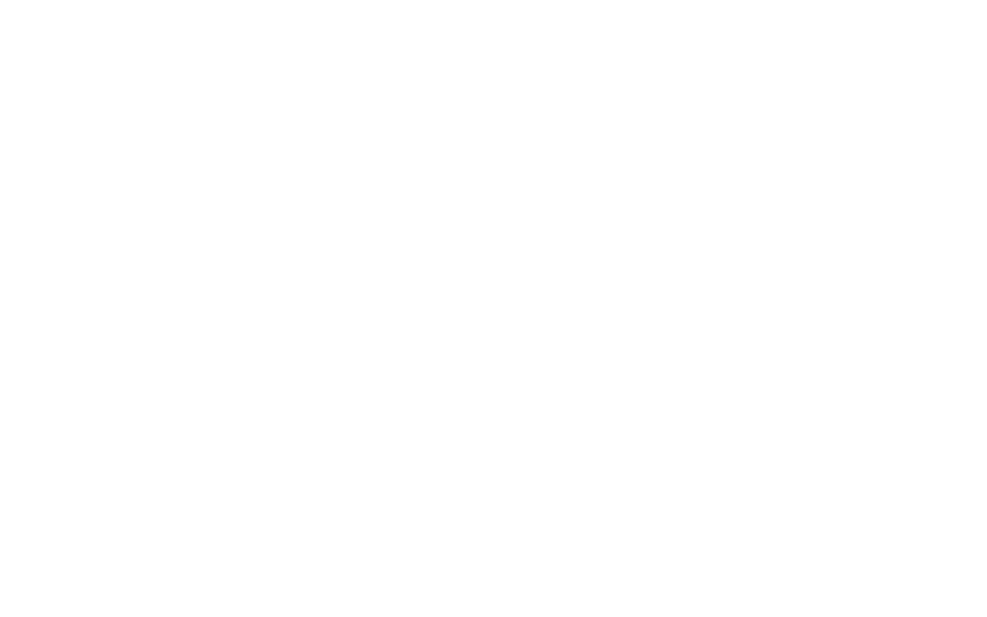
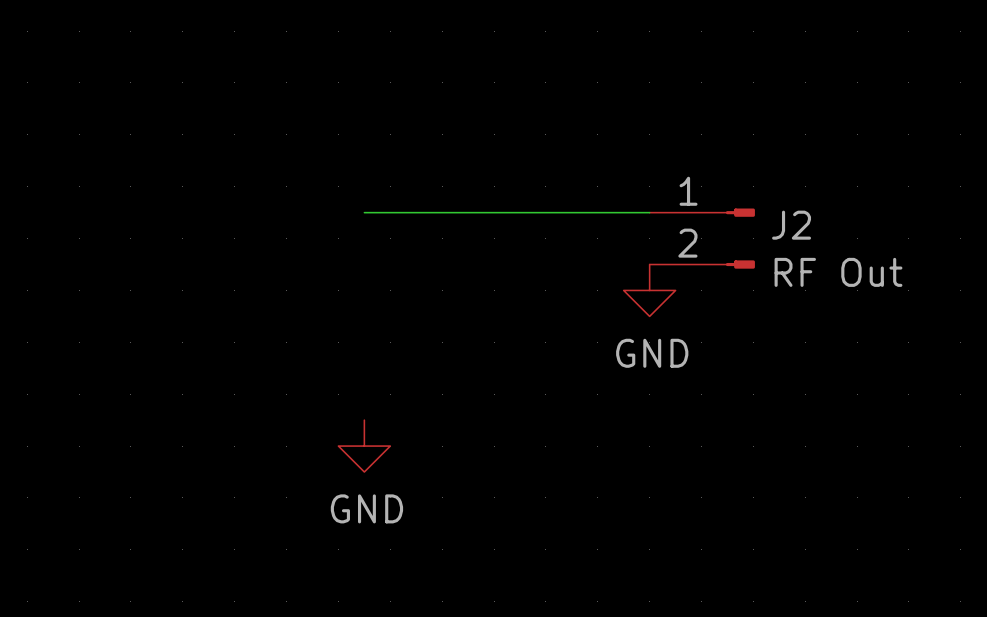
wire: none -> (364, 212) (649, 212)
J2: none -> RF Out (702, 238)
power symbol: none -> GND (649, 290)
power symbol: none -> GND (364, 446)

